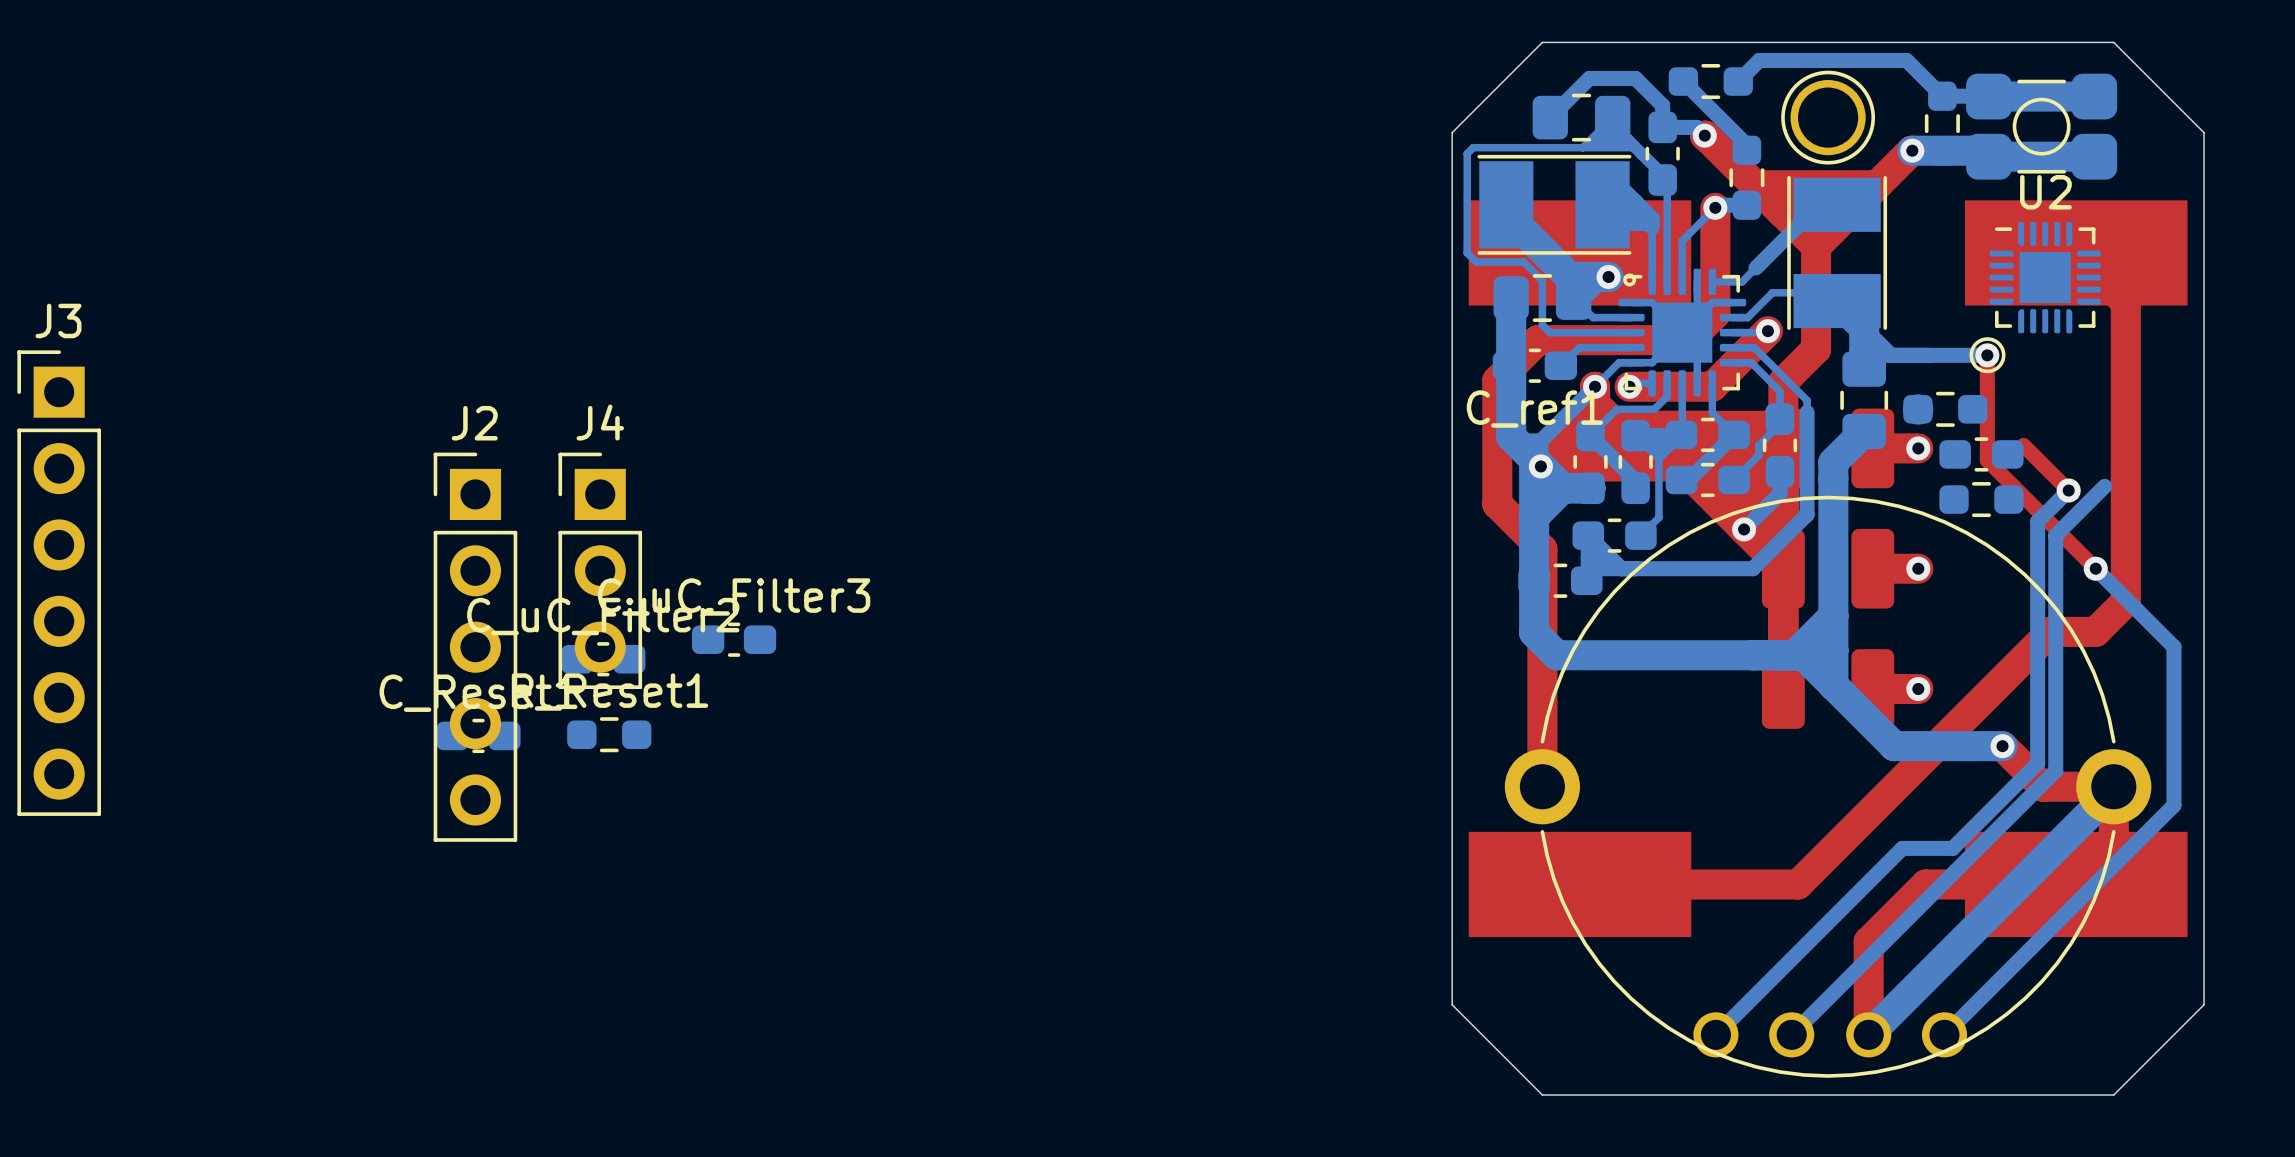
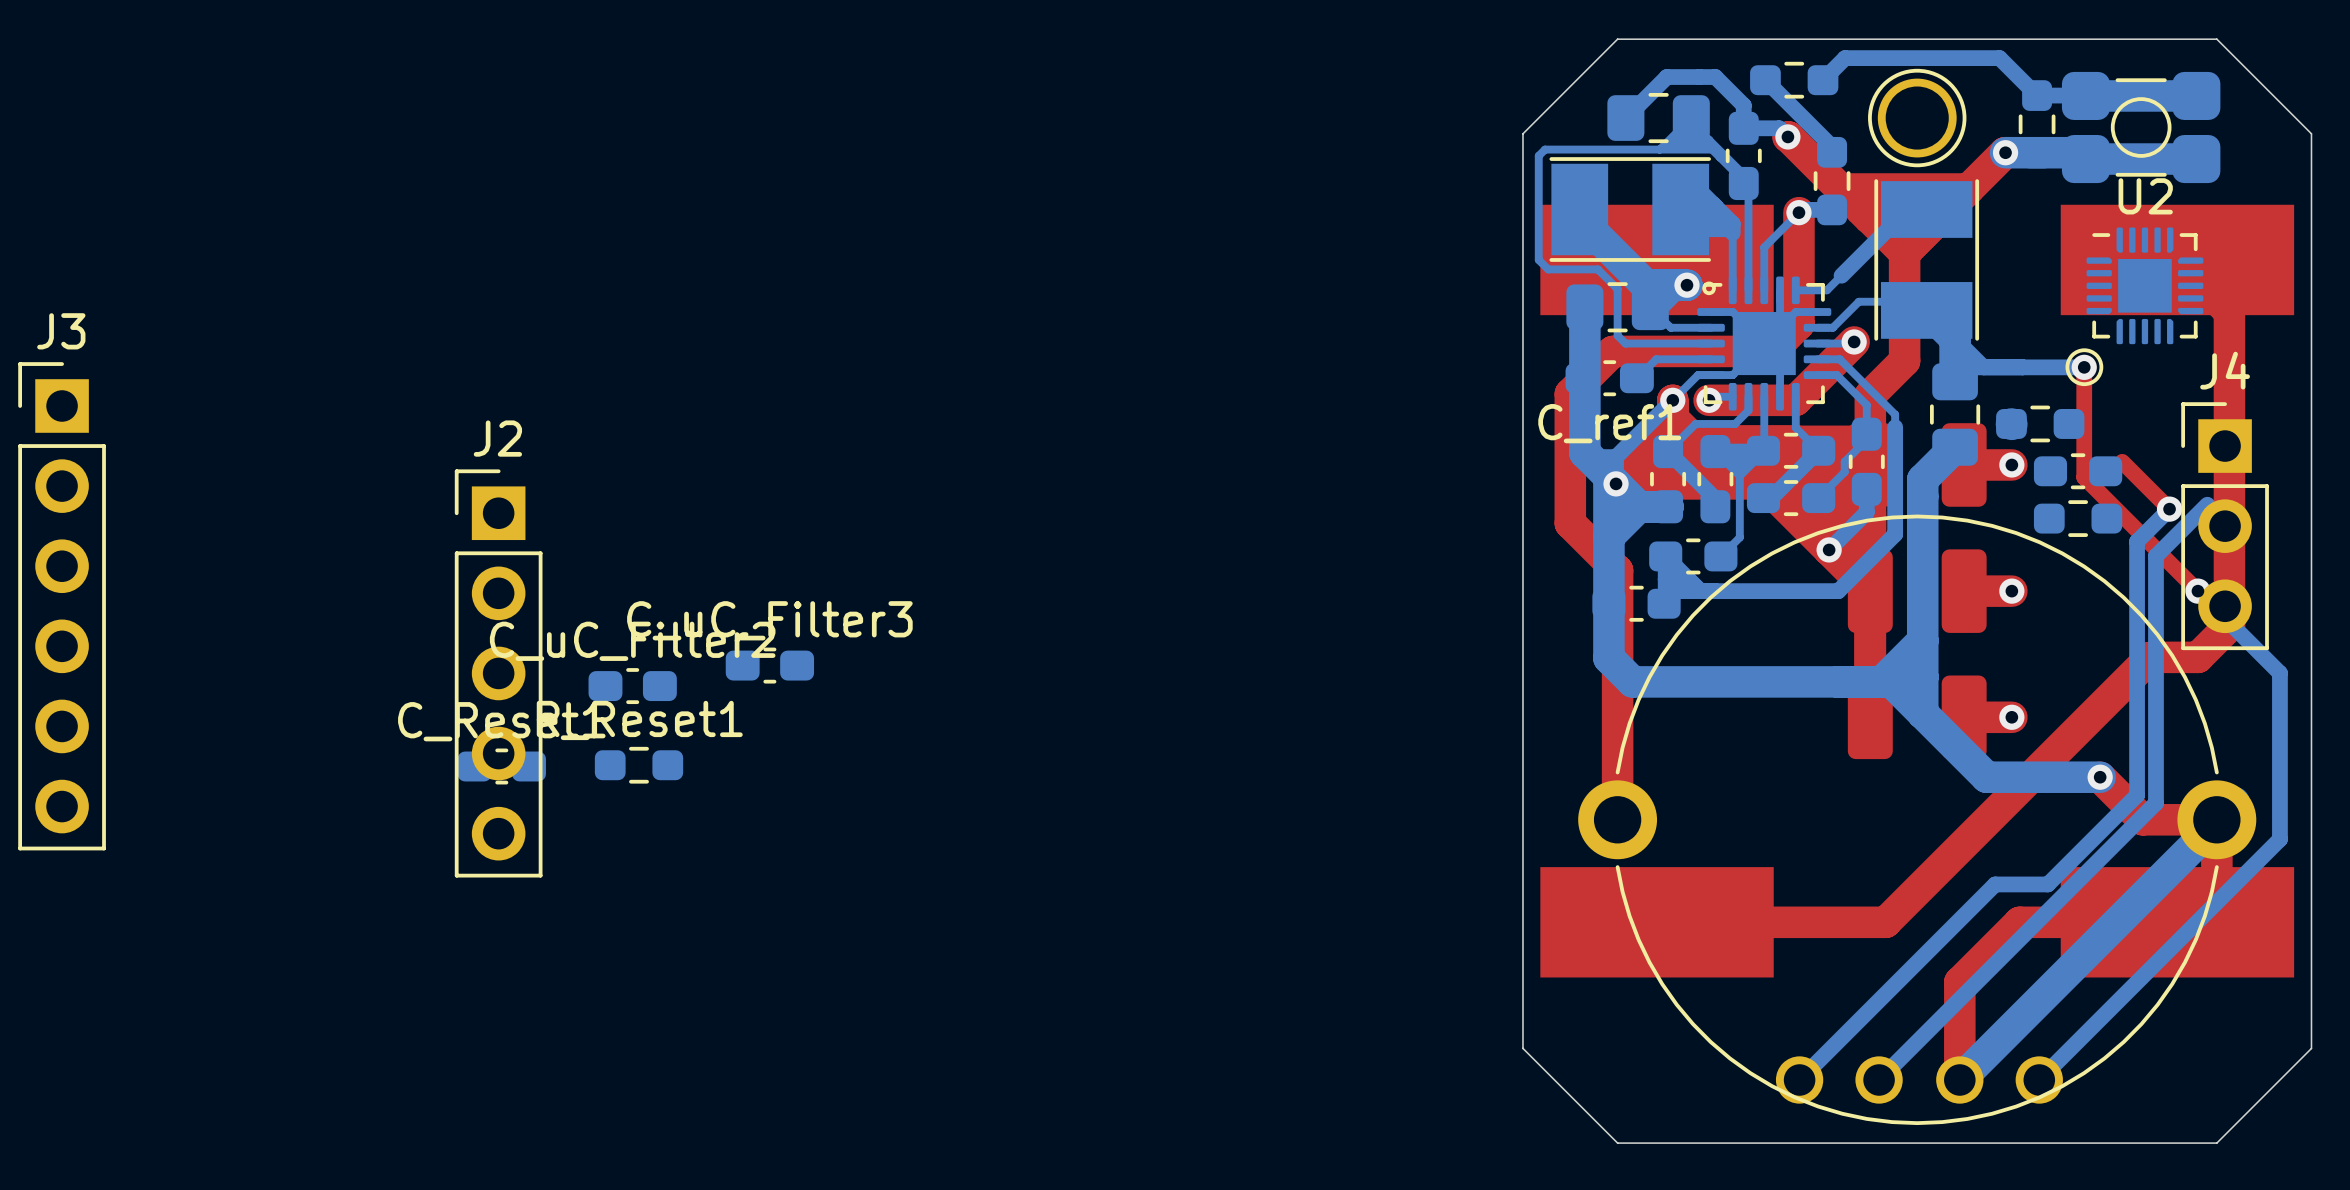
J4 position: (600, 570) -> (2225, 526)

